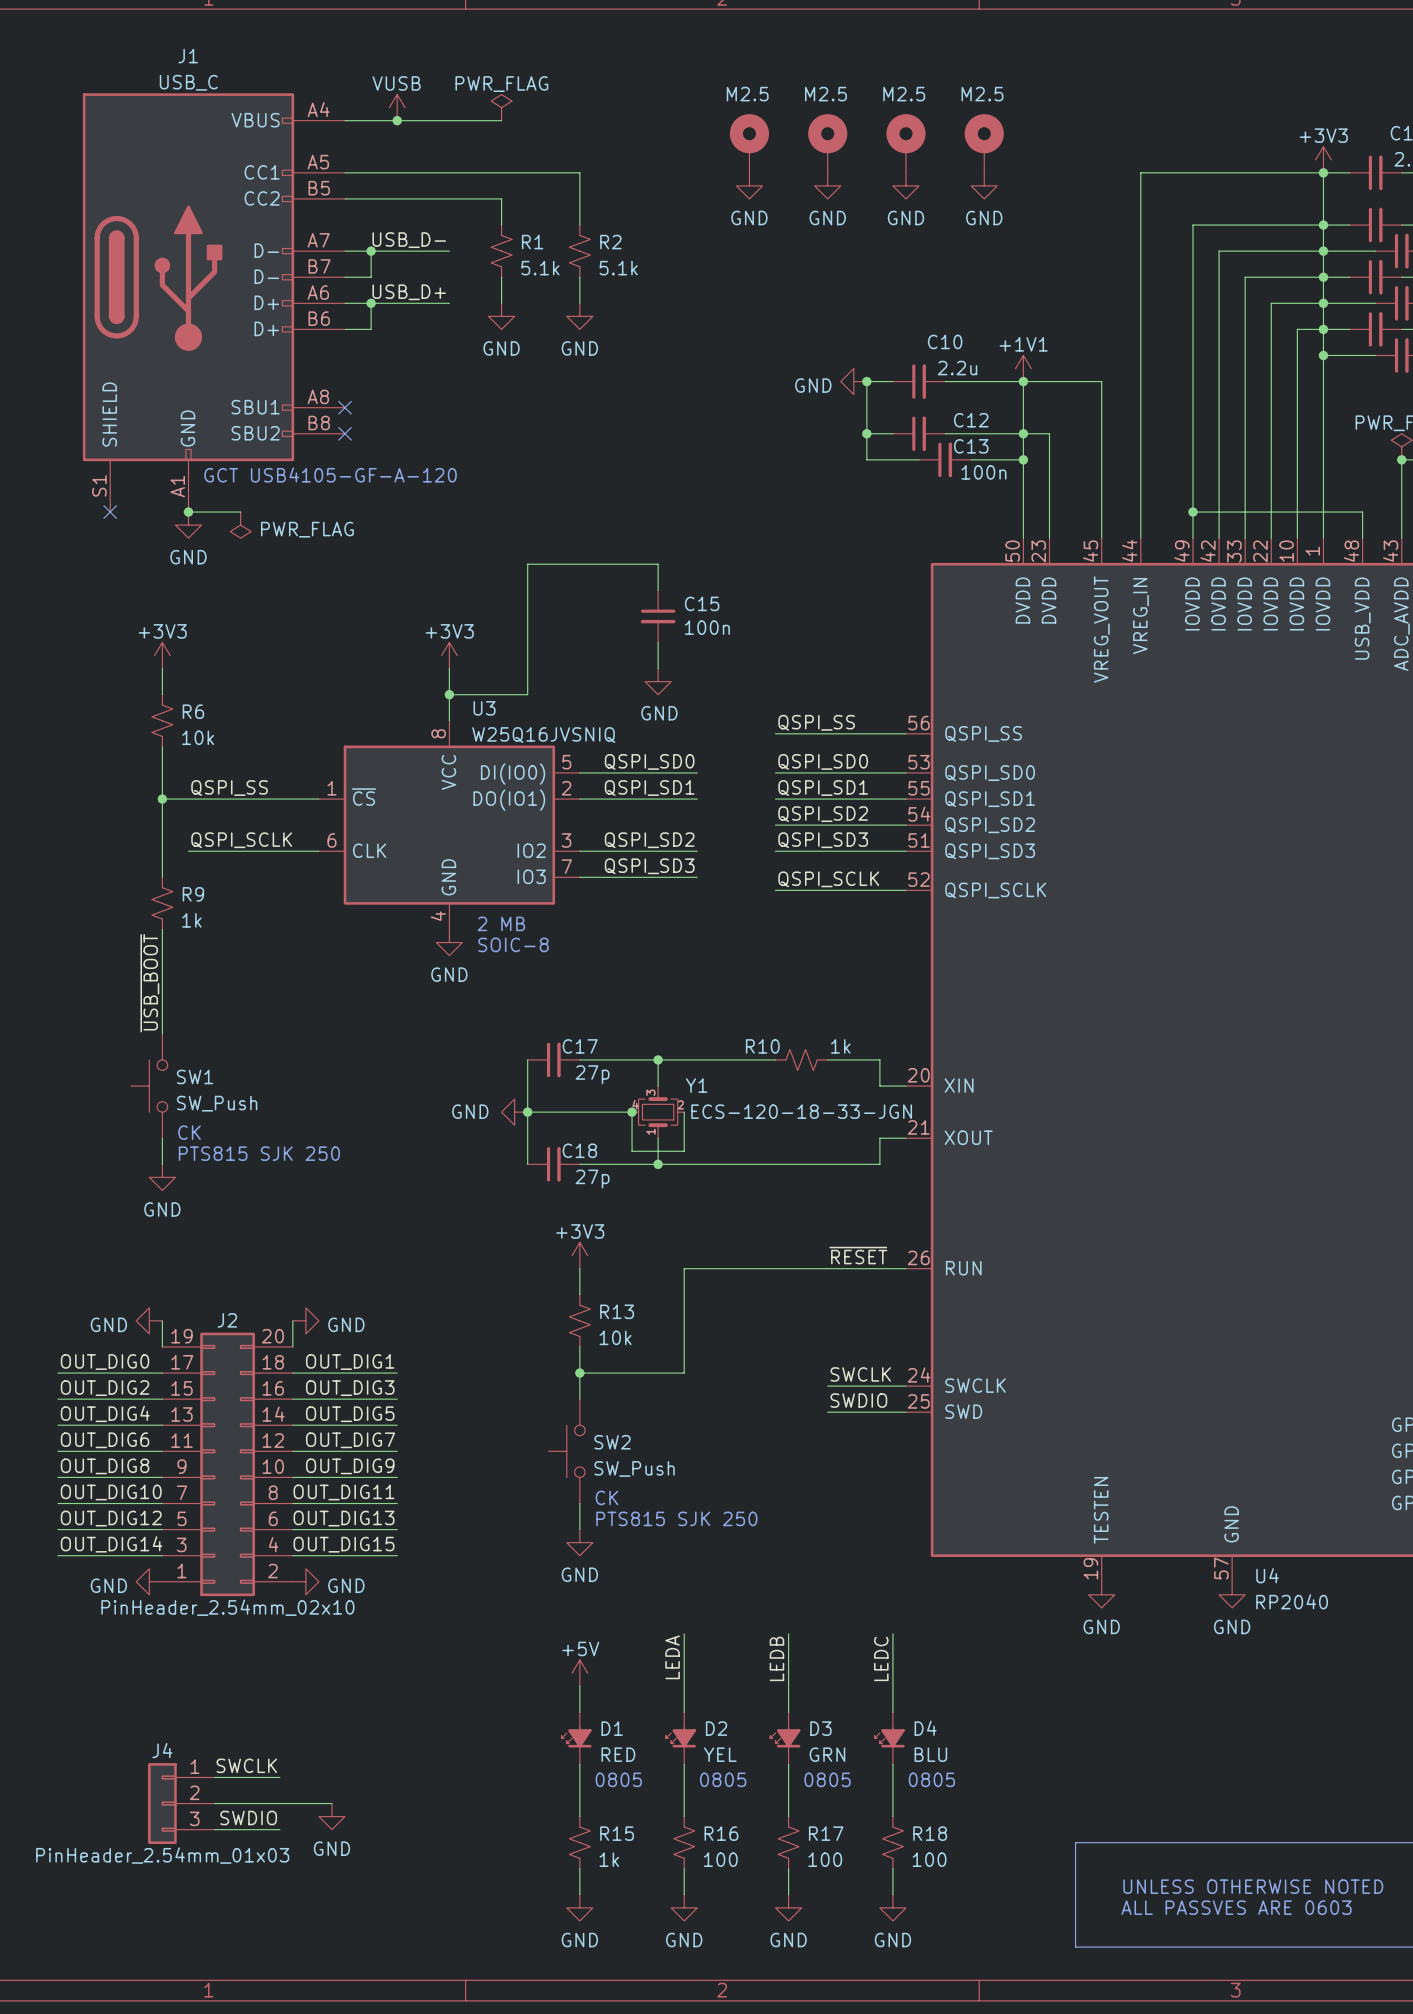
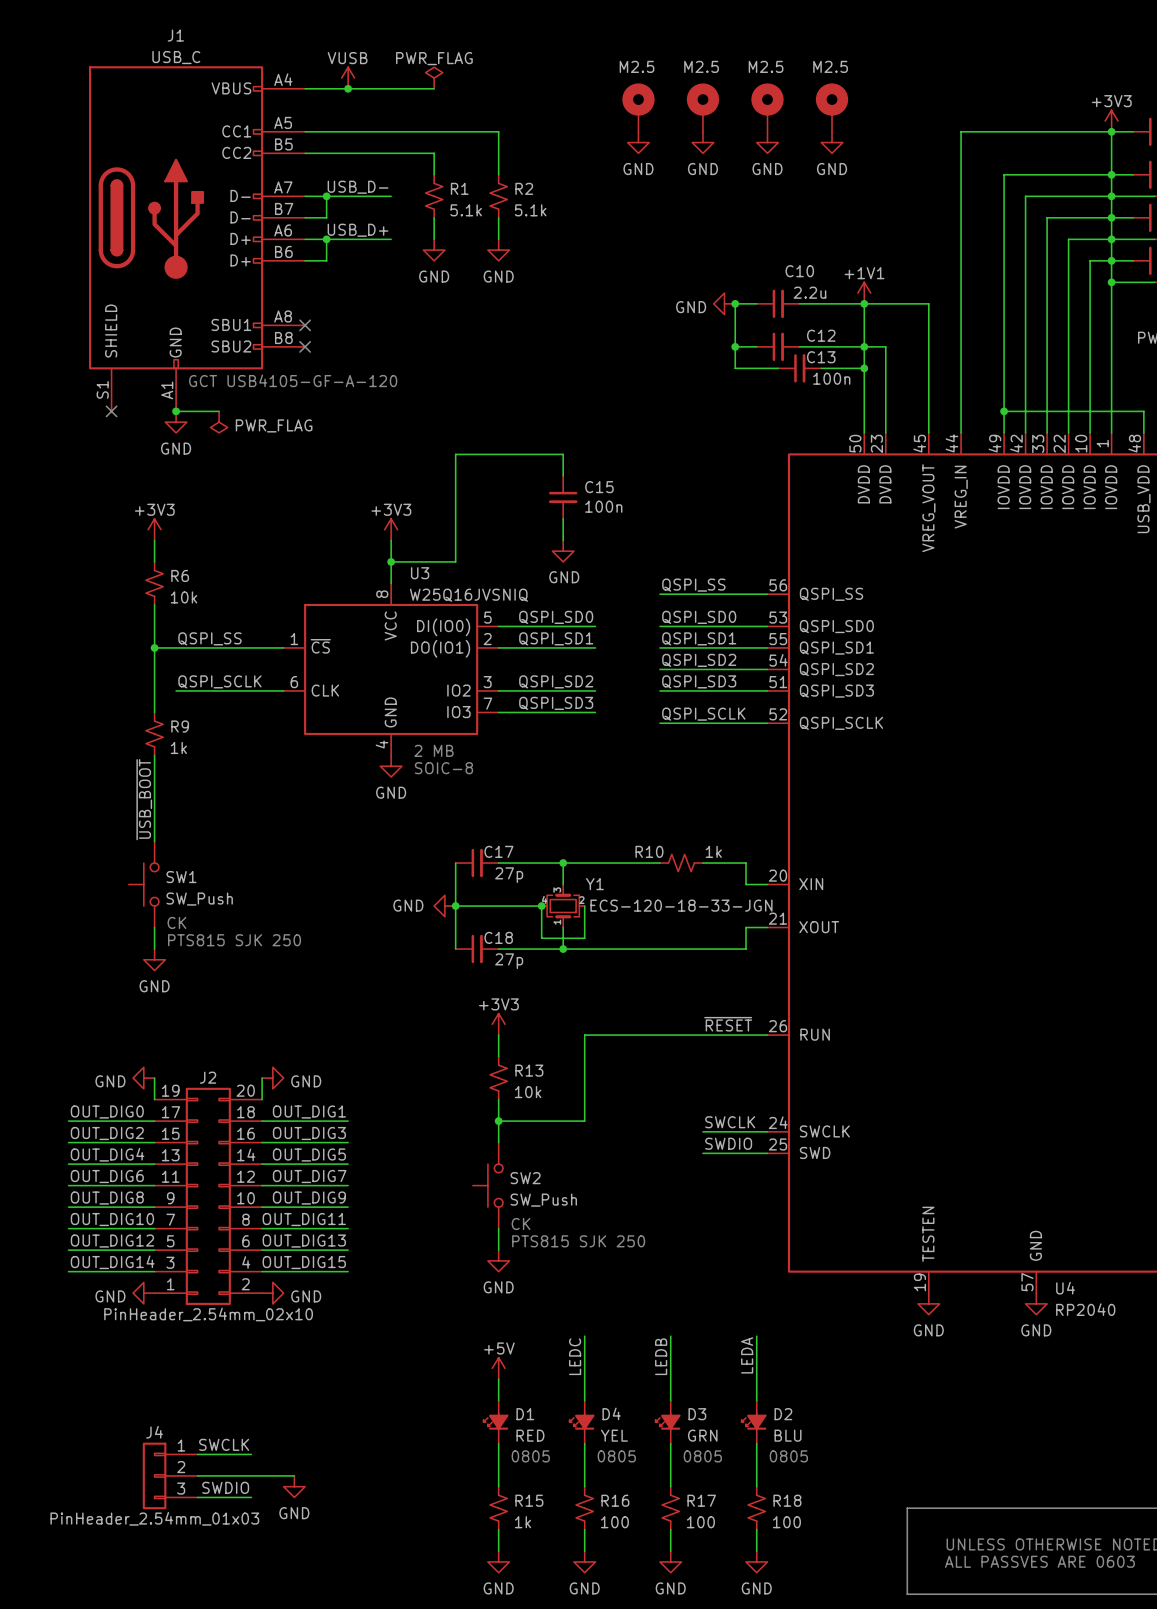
label: LEDA (672, 1657) -> LEDC (575, 1356)
label: LEDC (881, 1658) -> LEDA (747, 1355)
D2 name: D2 (716, 1728) -> D4 (611, 1413)
D4 name: D4 (925, 1728) -> D2 (783, 1414)

